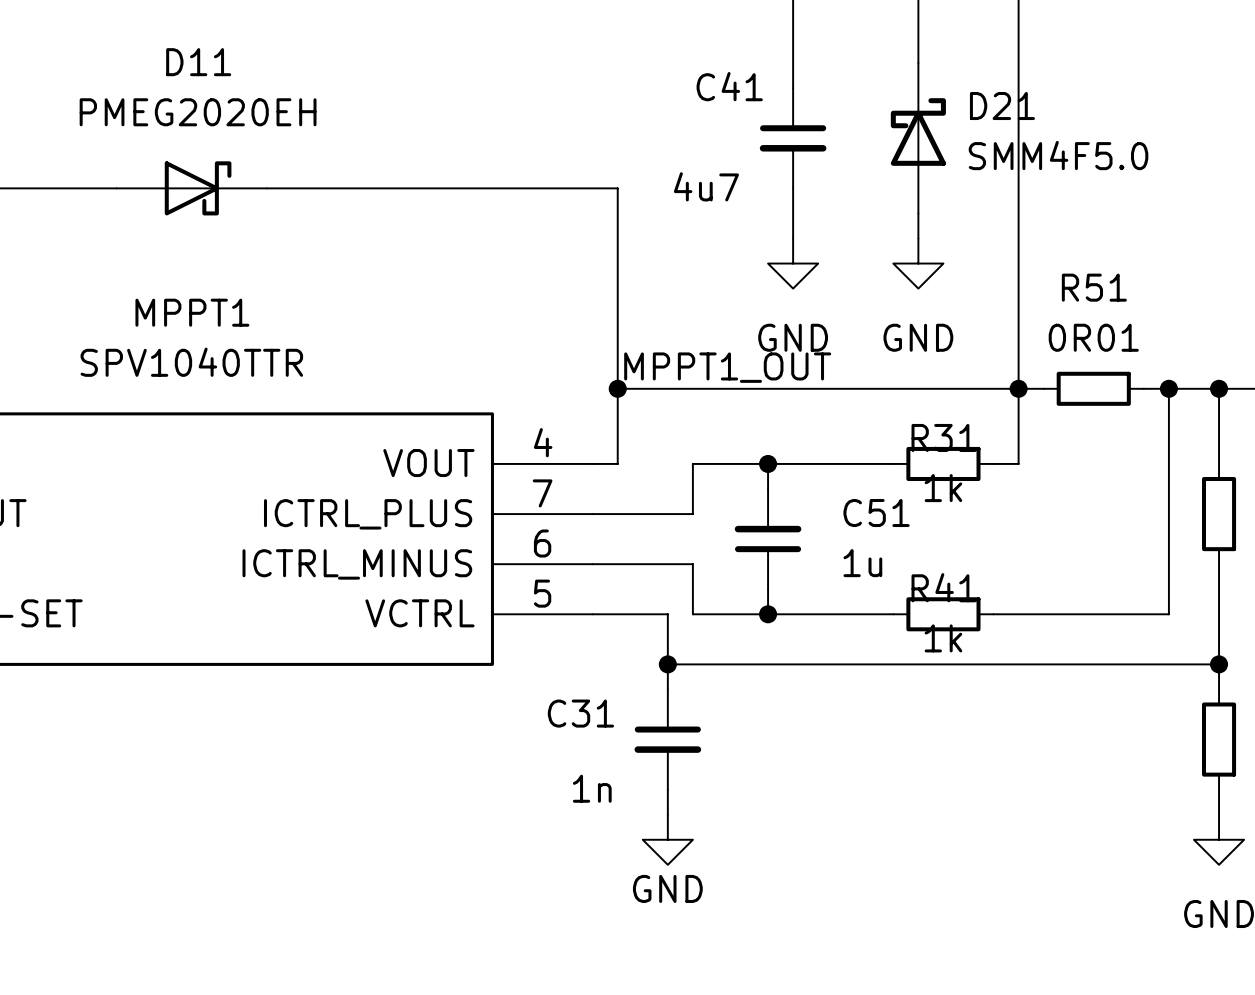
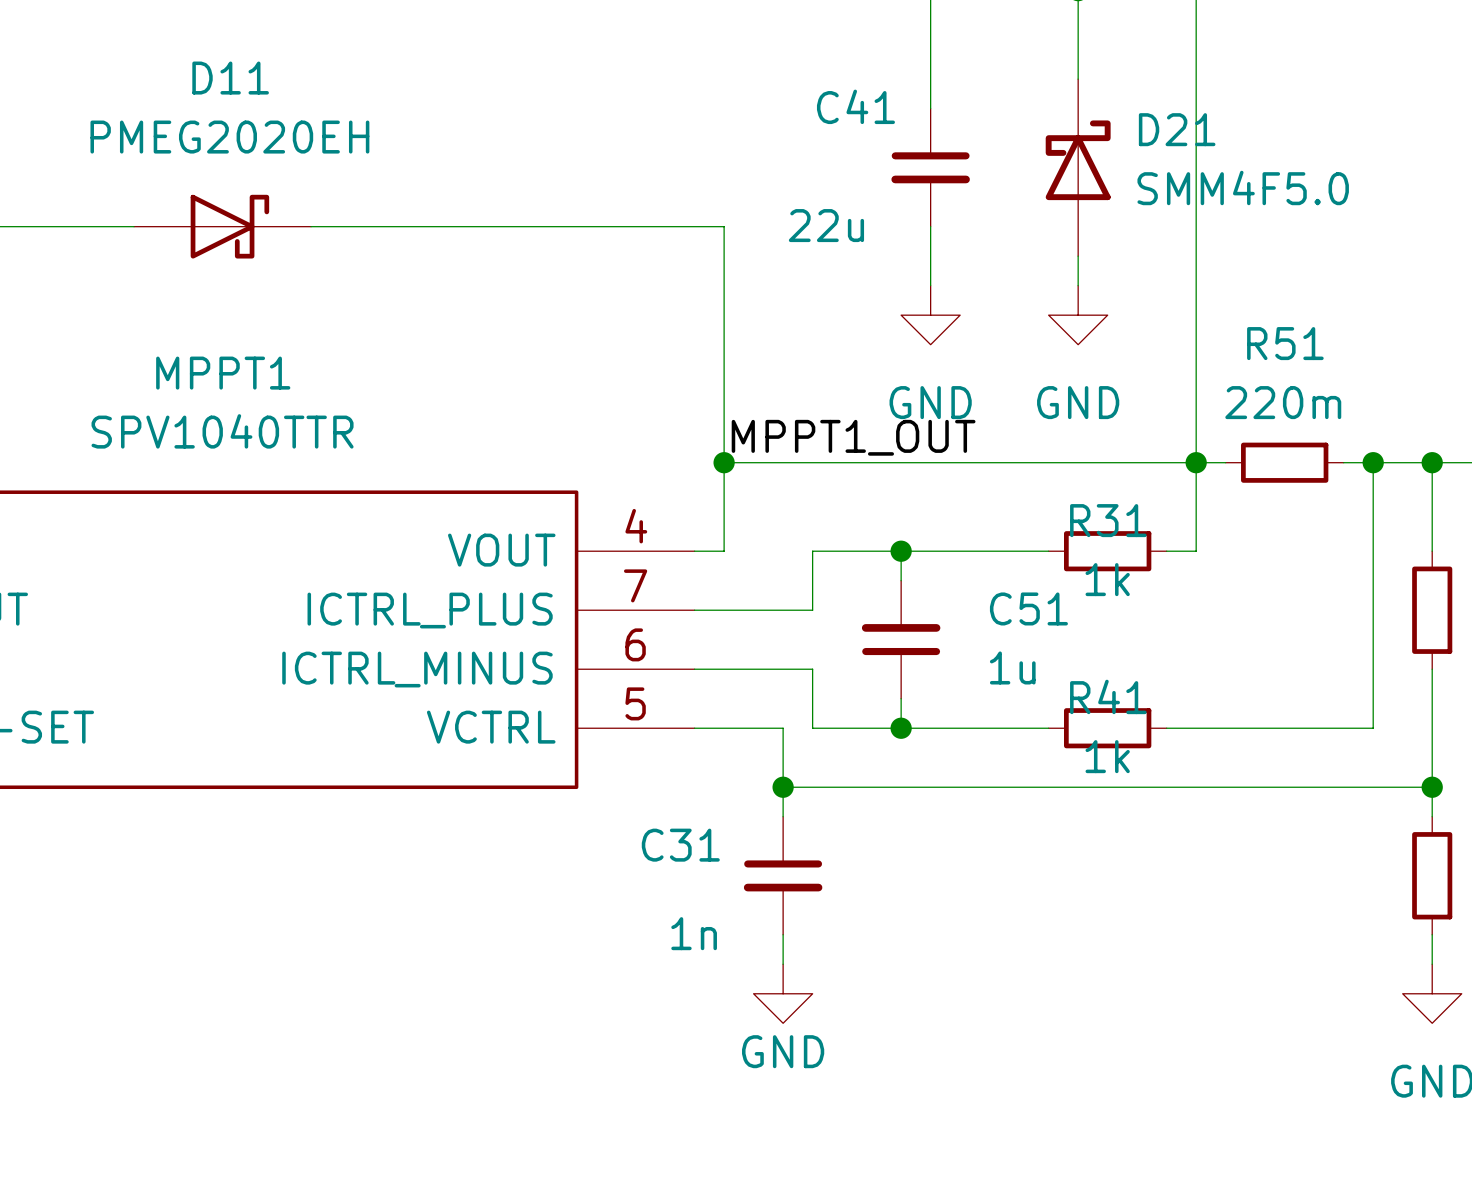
C41 value: 4u7 (706, 186) -> 22u (826, 225)
R51 value: 0R01 (1093, 337) -> 220m (1283, 402)

